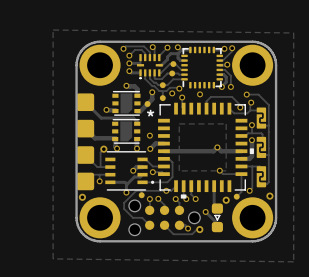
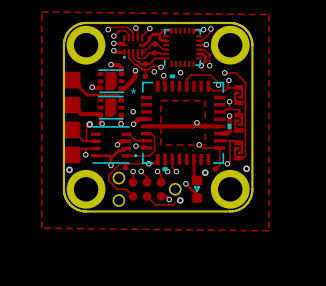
via: (177, 47) -> none
part footprint: [158, 102, 254, 199] -> [140, 74, 232, 172]

